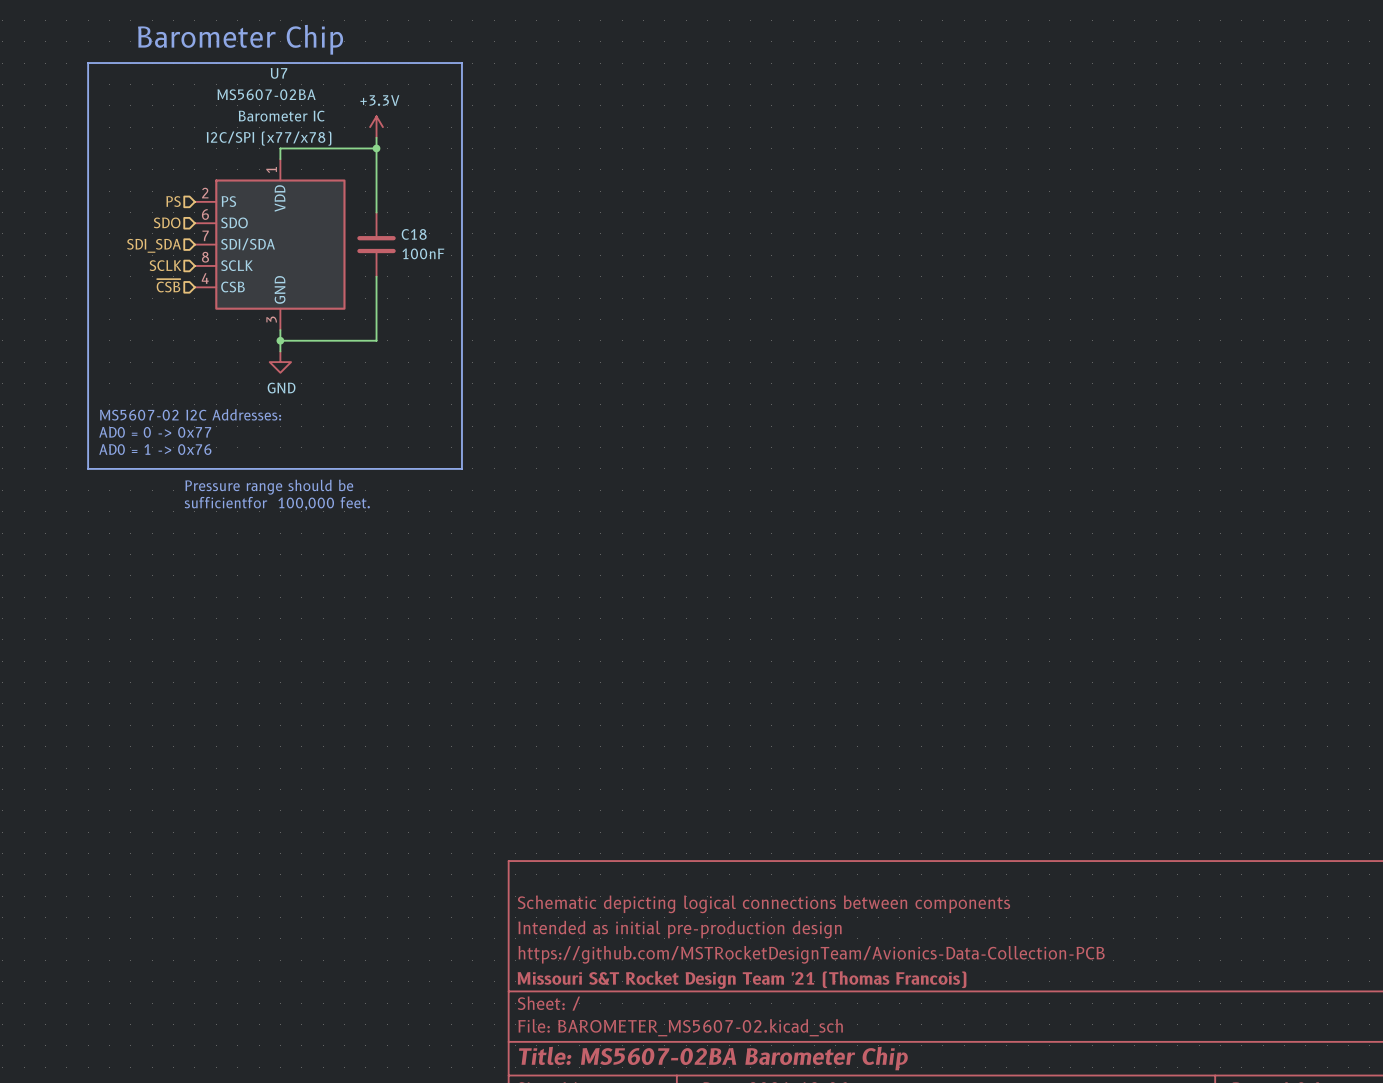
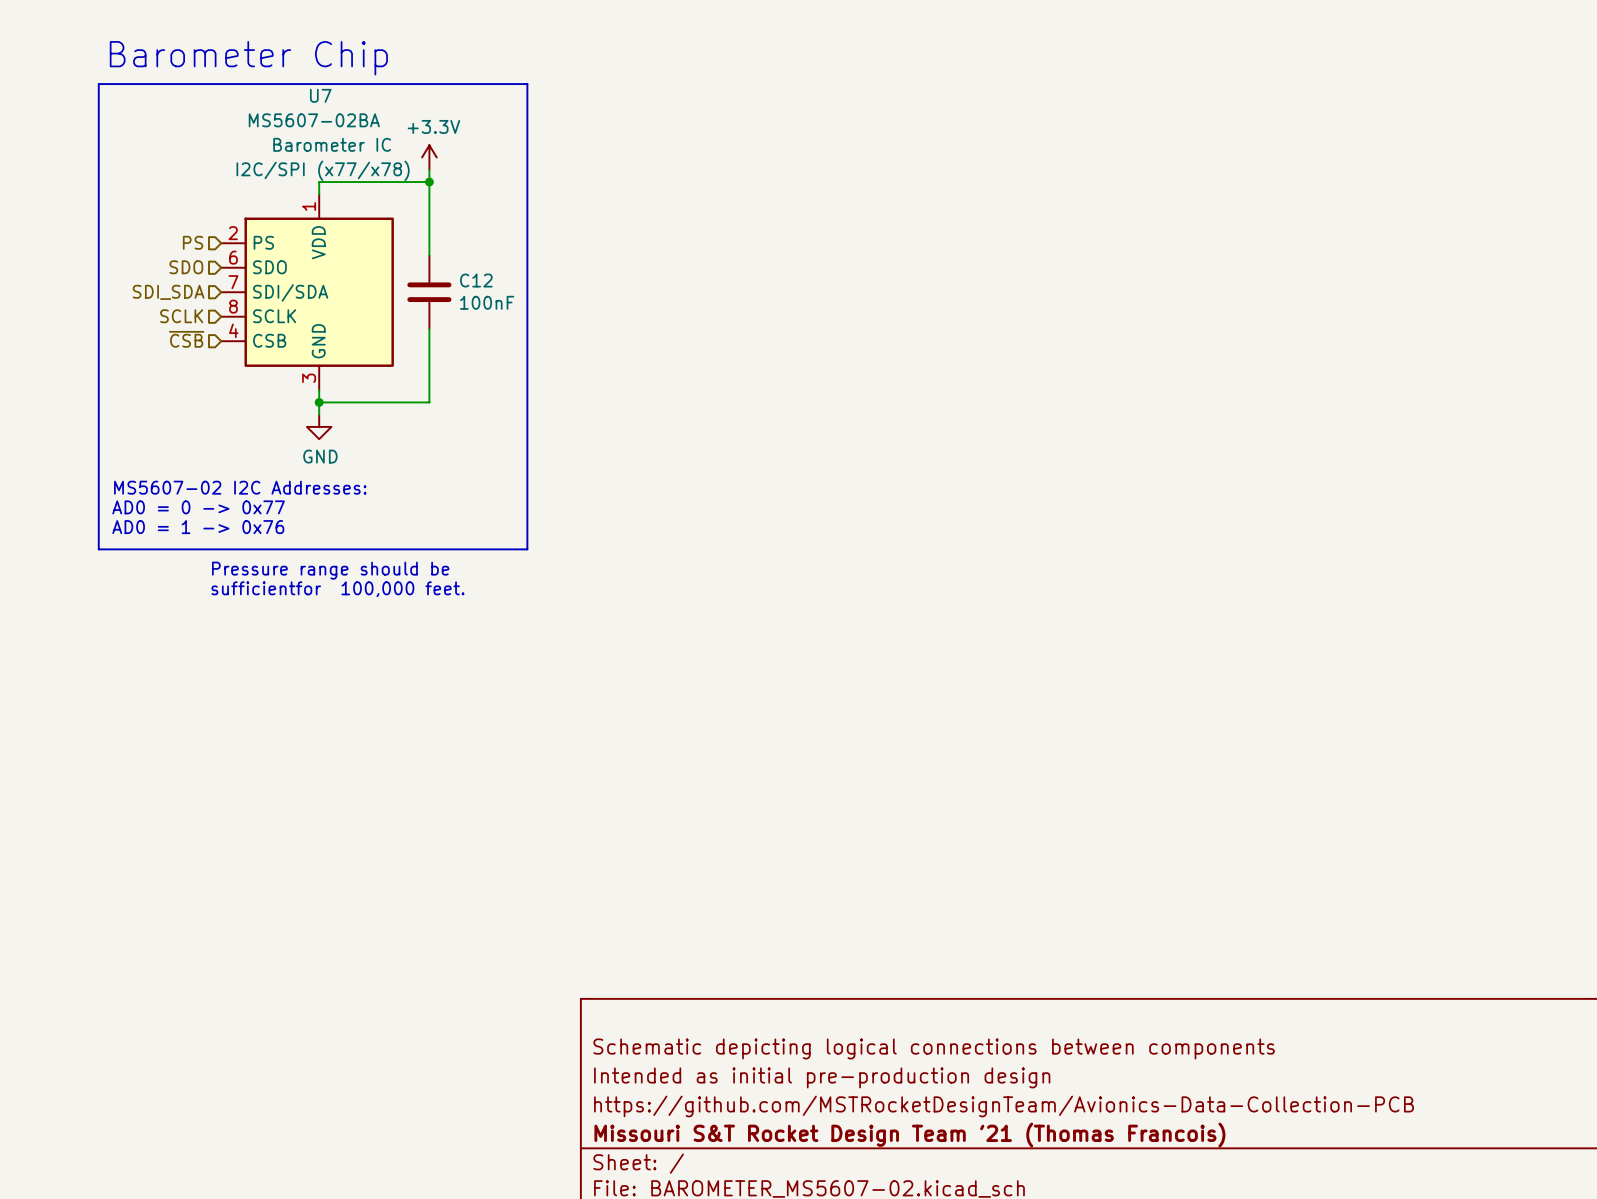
C18 name: C18 (414, 234) -> C12 (476, 280)

